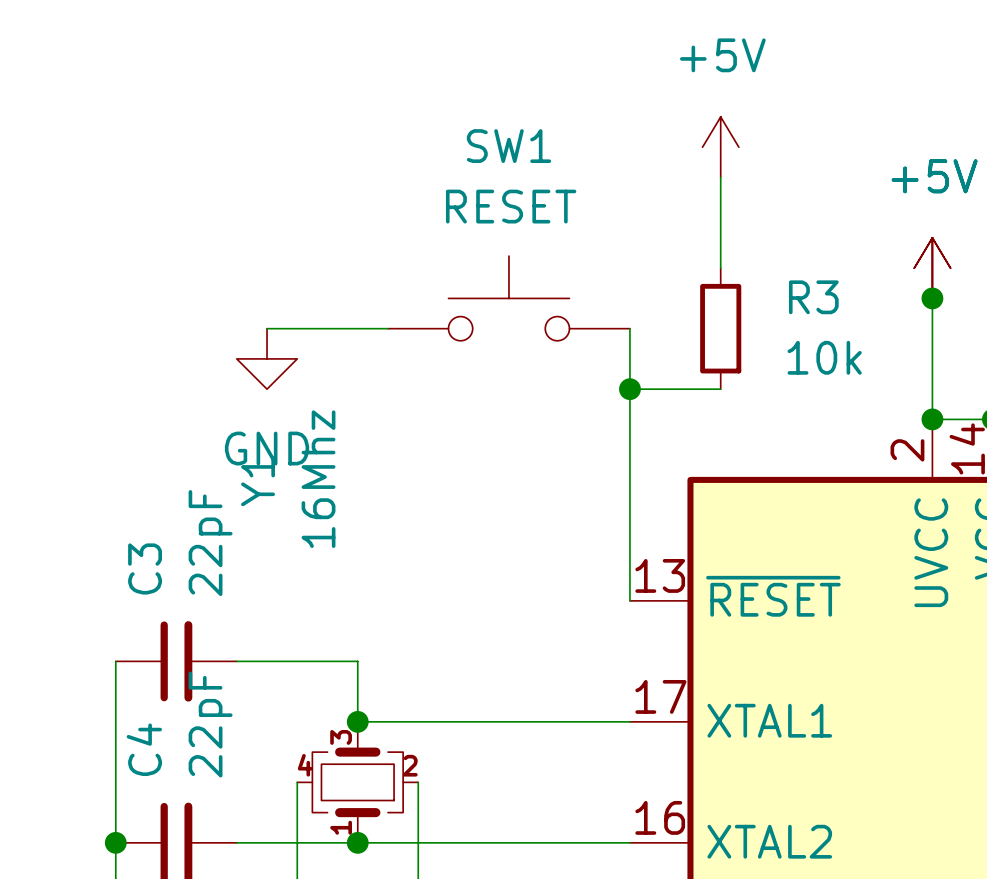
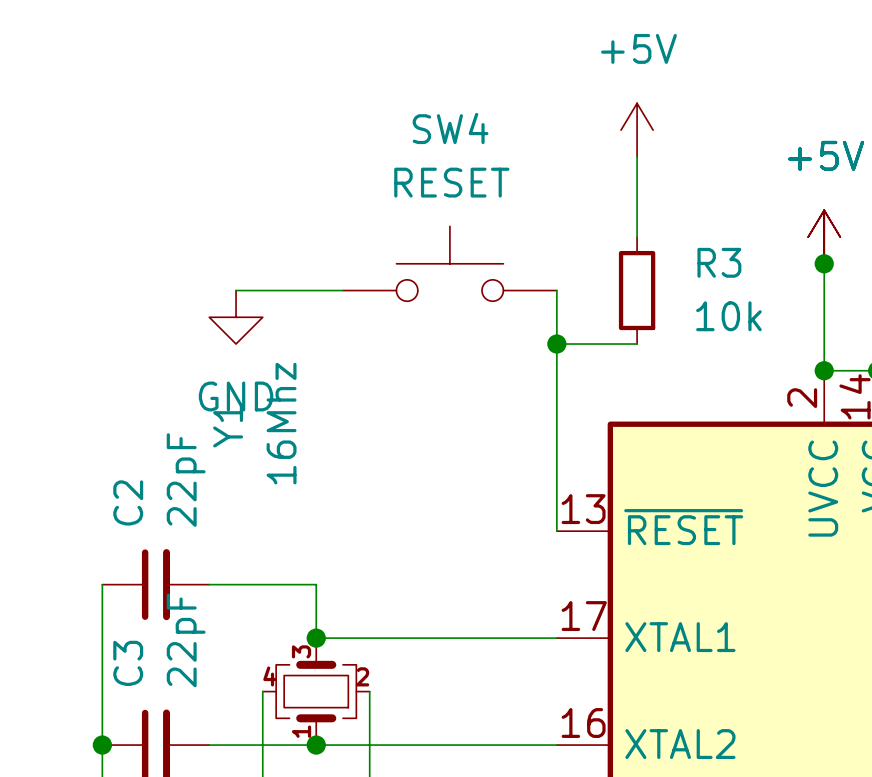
SW1 name: SW1 (508, 146) -> SW4 (450, 128)
C3 name: C3 (145, 568) -> C2 (128, 502)
C4 name: C4 (144, 749) -> C3 (128, 663)

